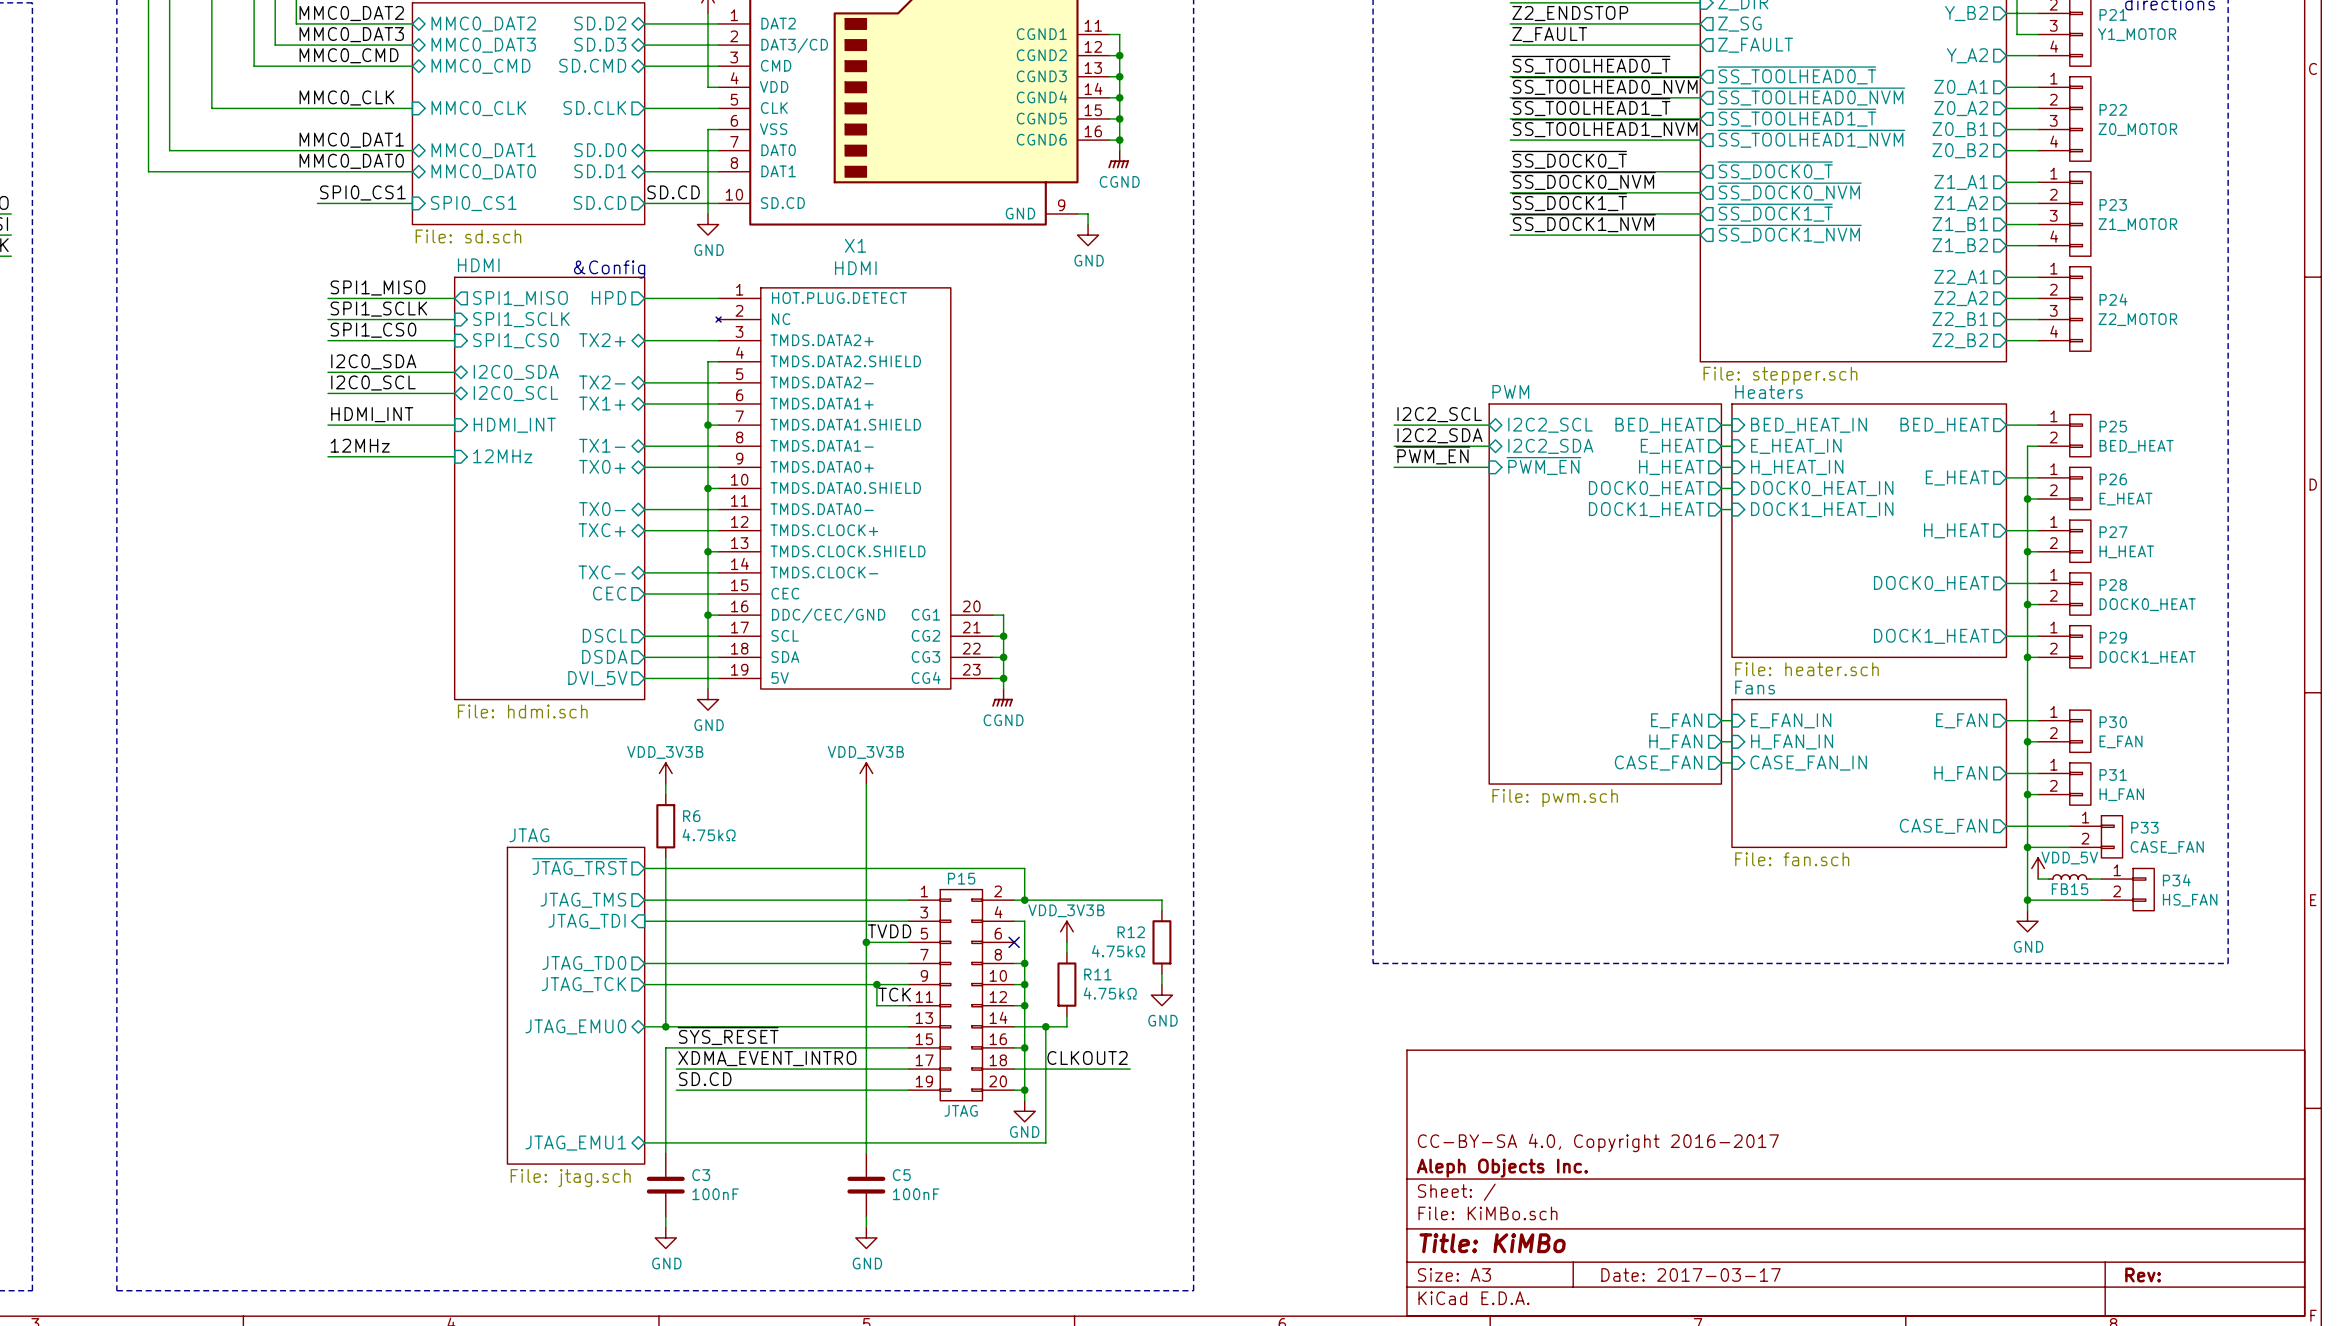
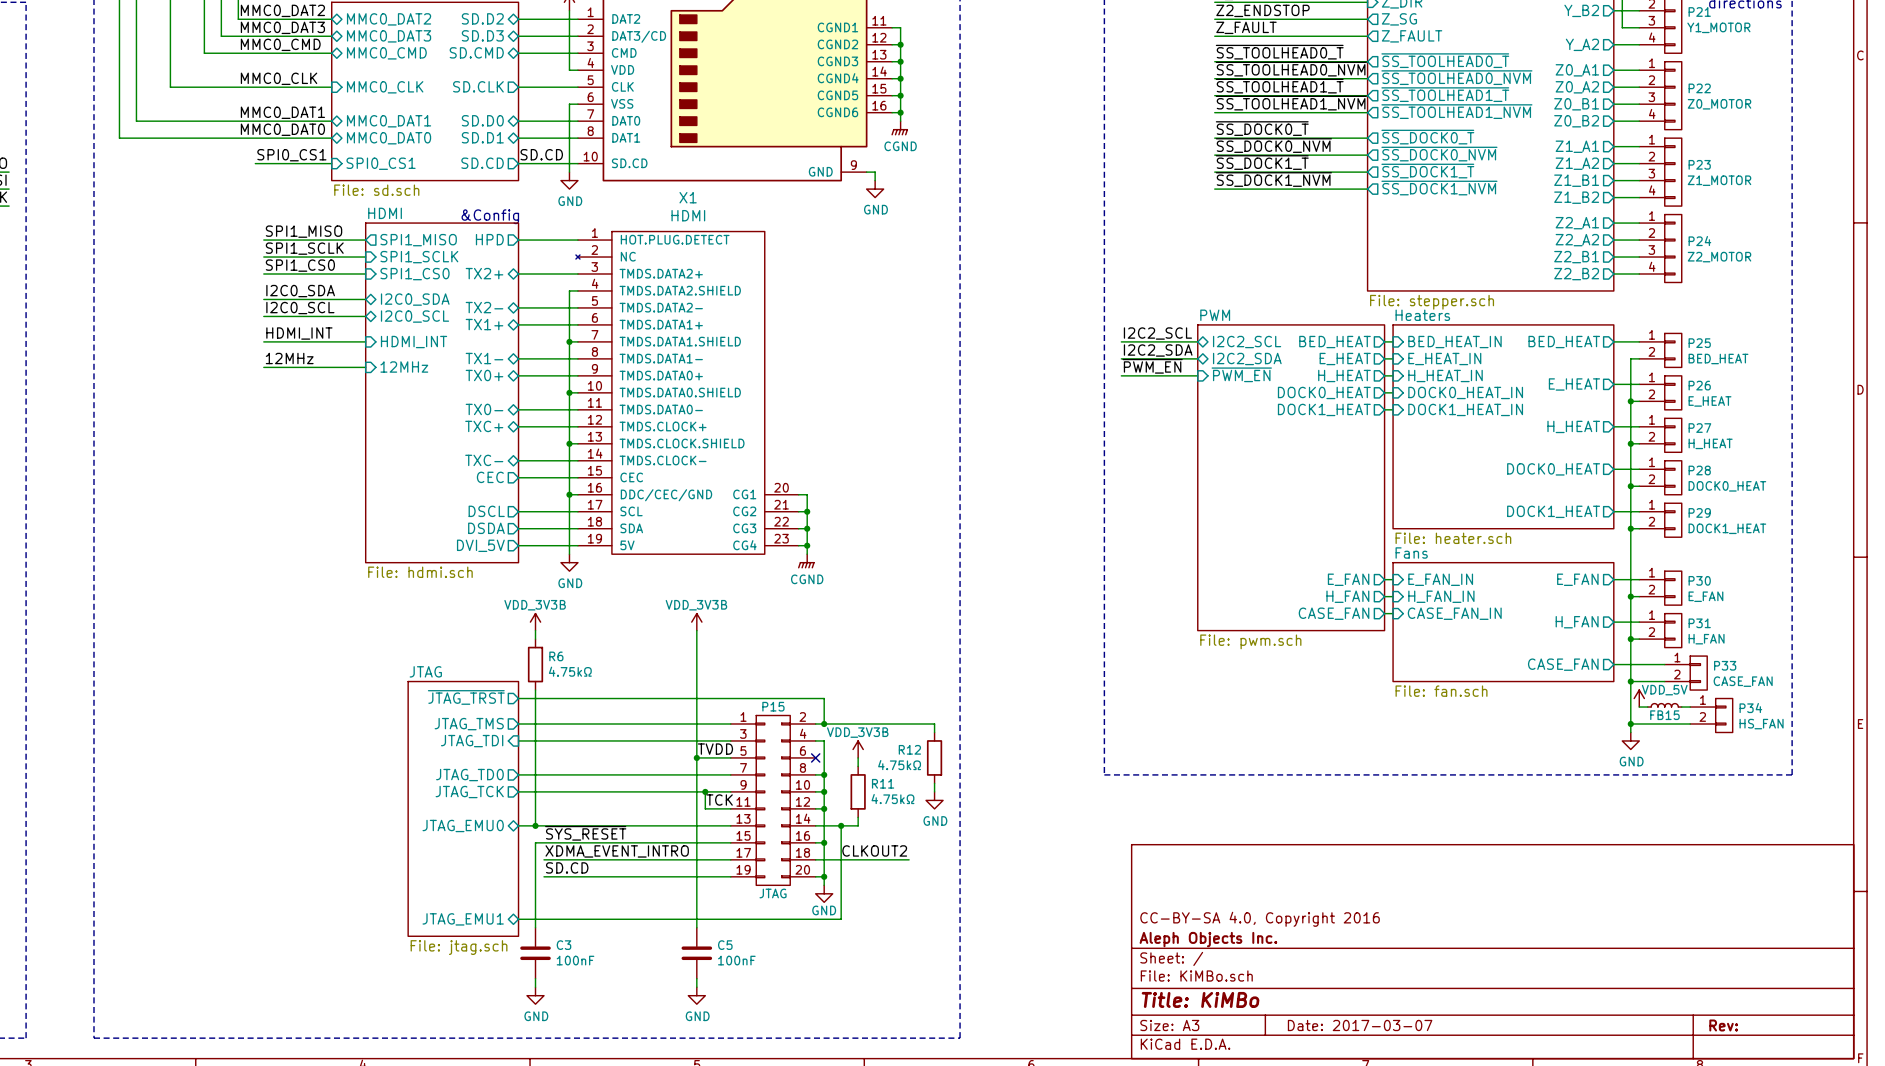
title block: CC-BY-SA 4.0, Copyright 2016-2017 (1598, 1142) -> CC-BY-SA 4.0, Copyright 2016 (1260, 919)
title block: Date: 2017-03-17 (1691, 1274) -> Date: 2017-03-07 (1360, 1025)

